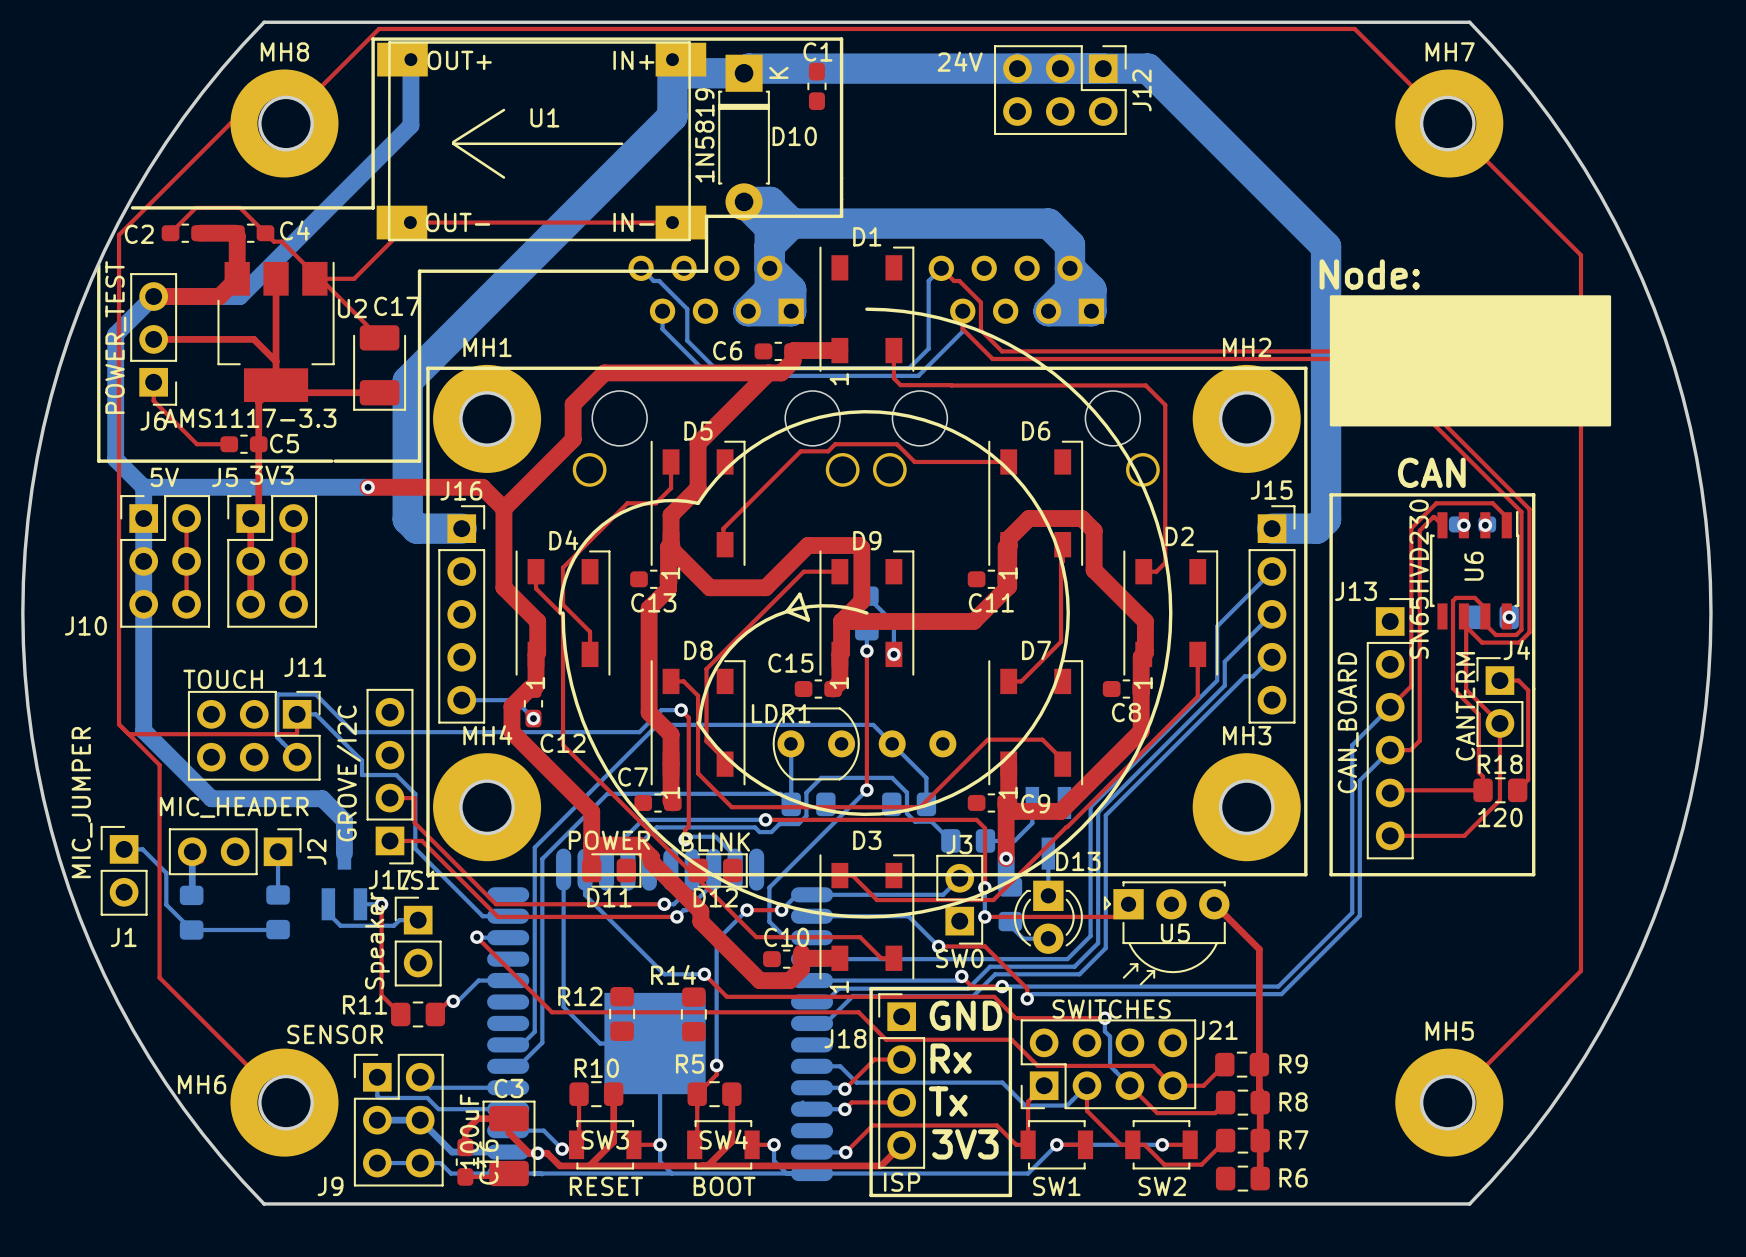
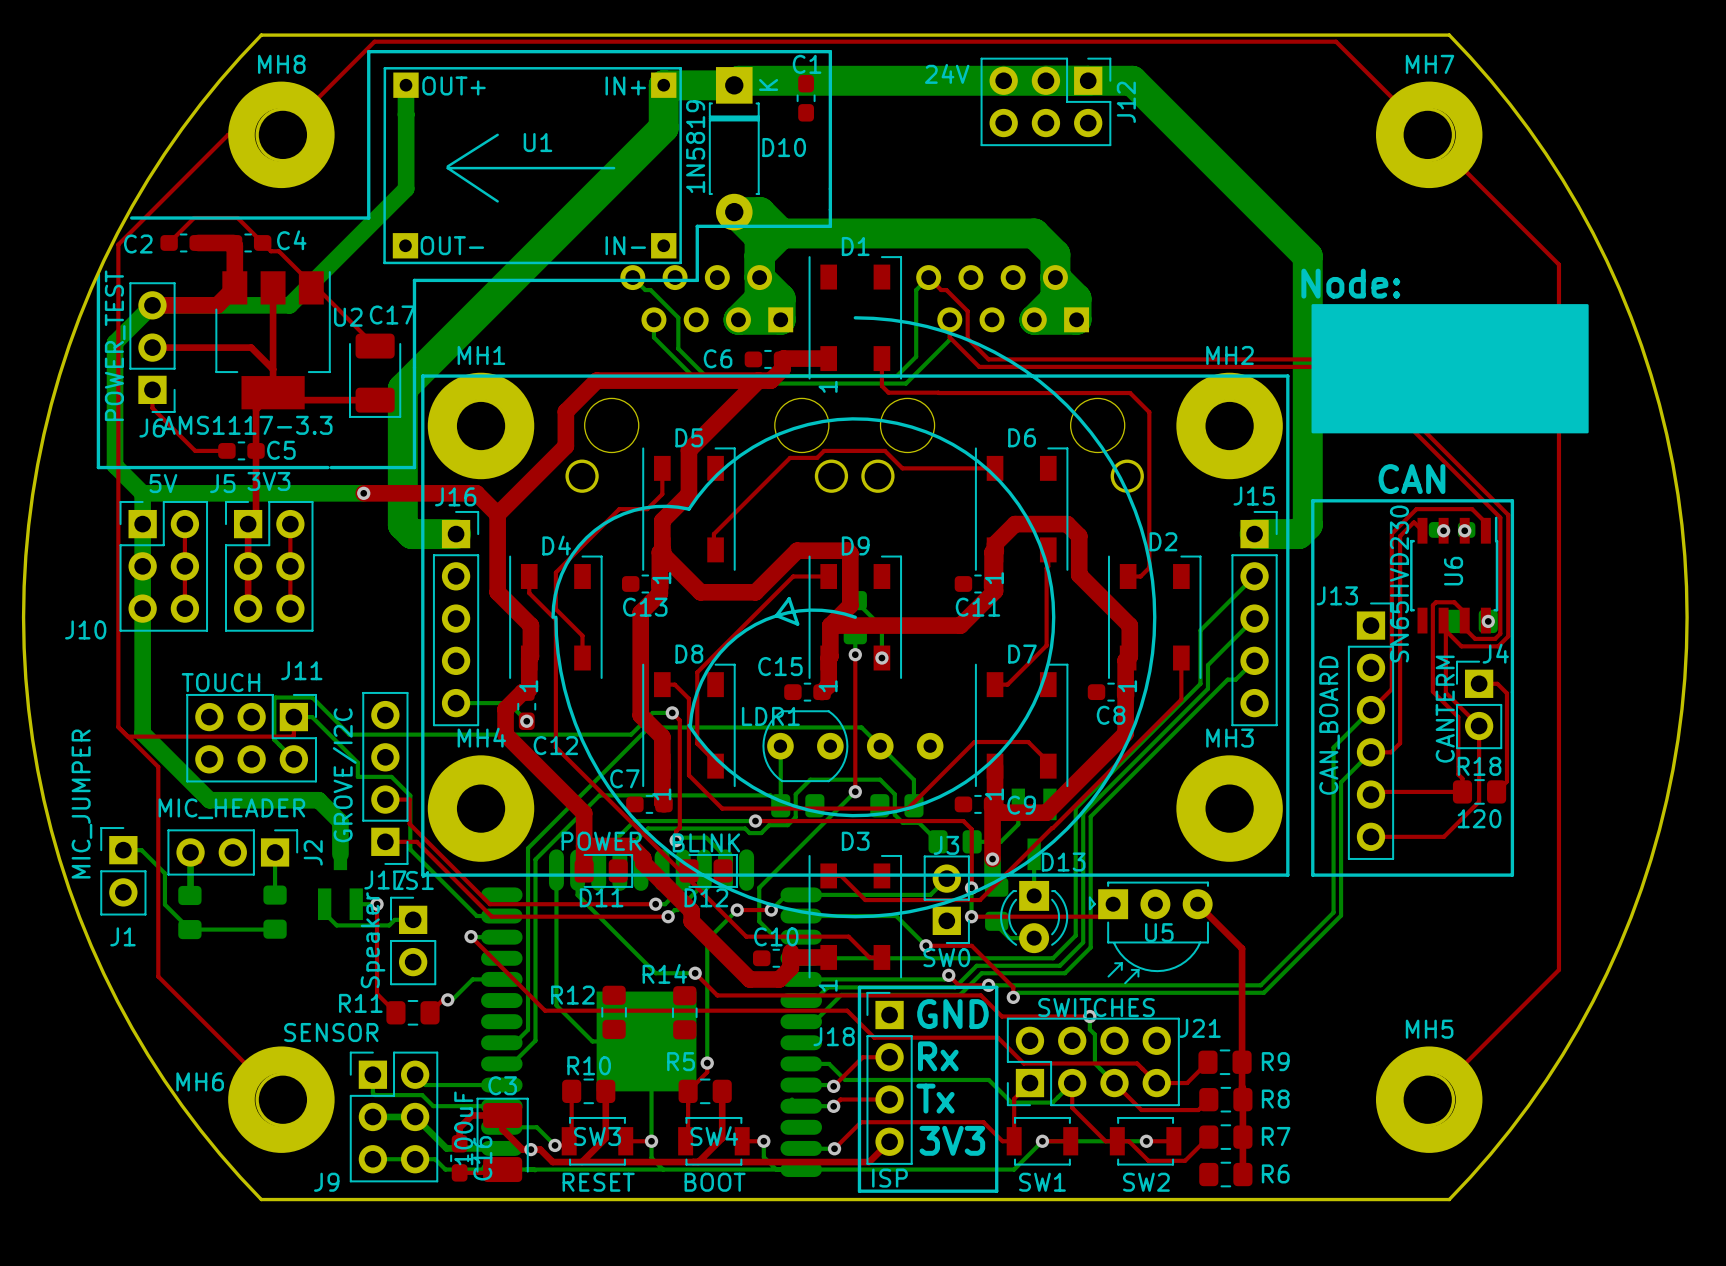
U1 footprint: [376, 41, 707, 242] -> [383, 67, 682, 265]
bottom track: (410, 102) (410, 125) (239, 296) -> (406, 114) (406, 188) (289, 305) (237, 305)
top track: (672, 222) (410, 222) (354, 278) (320, 278) -> none

